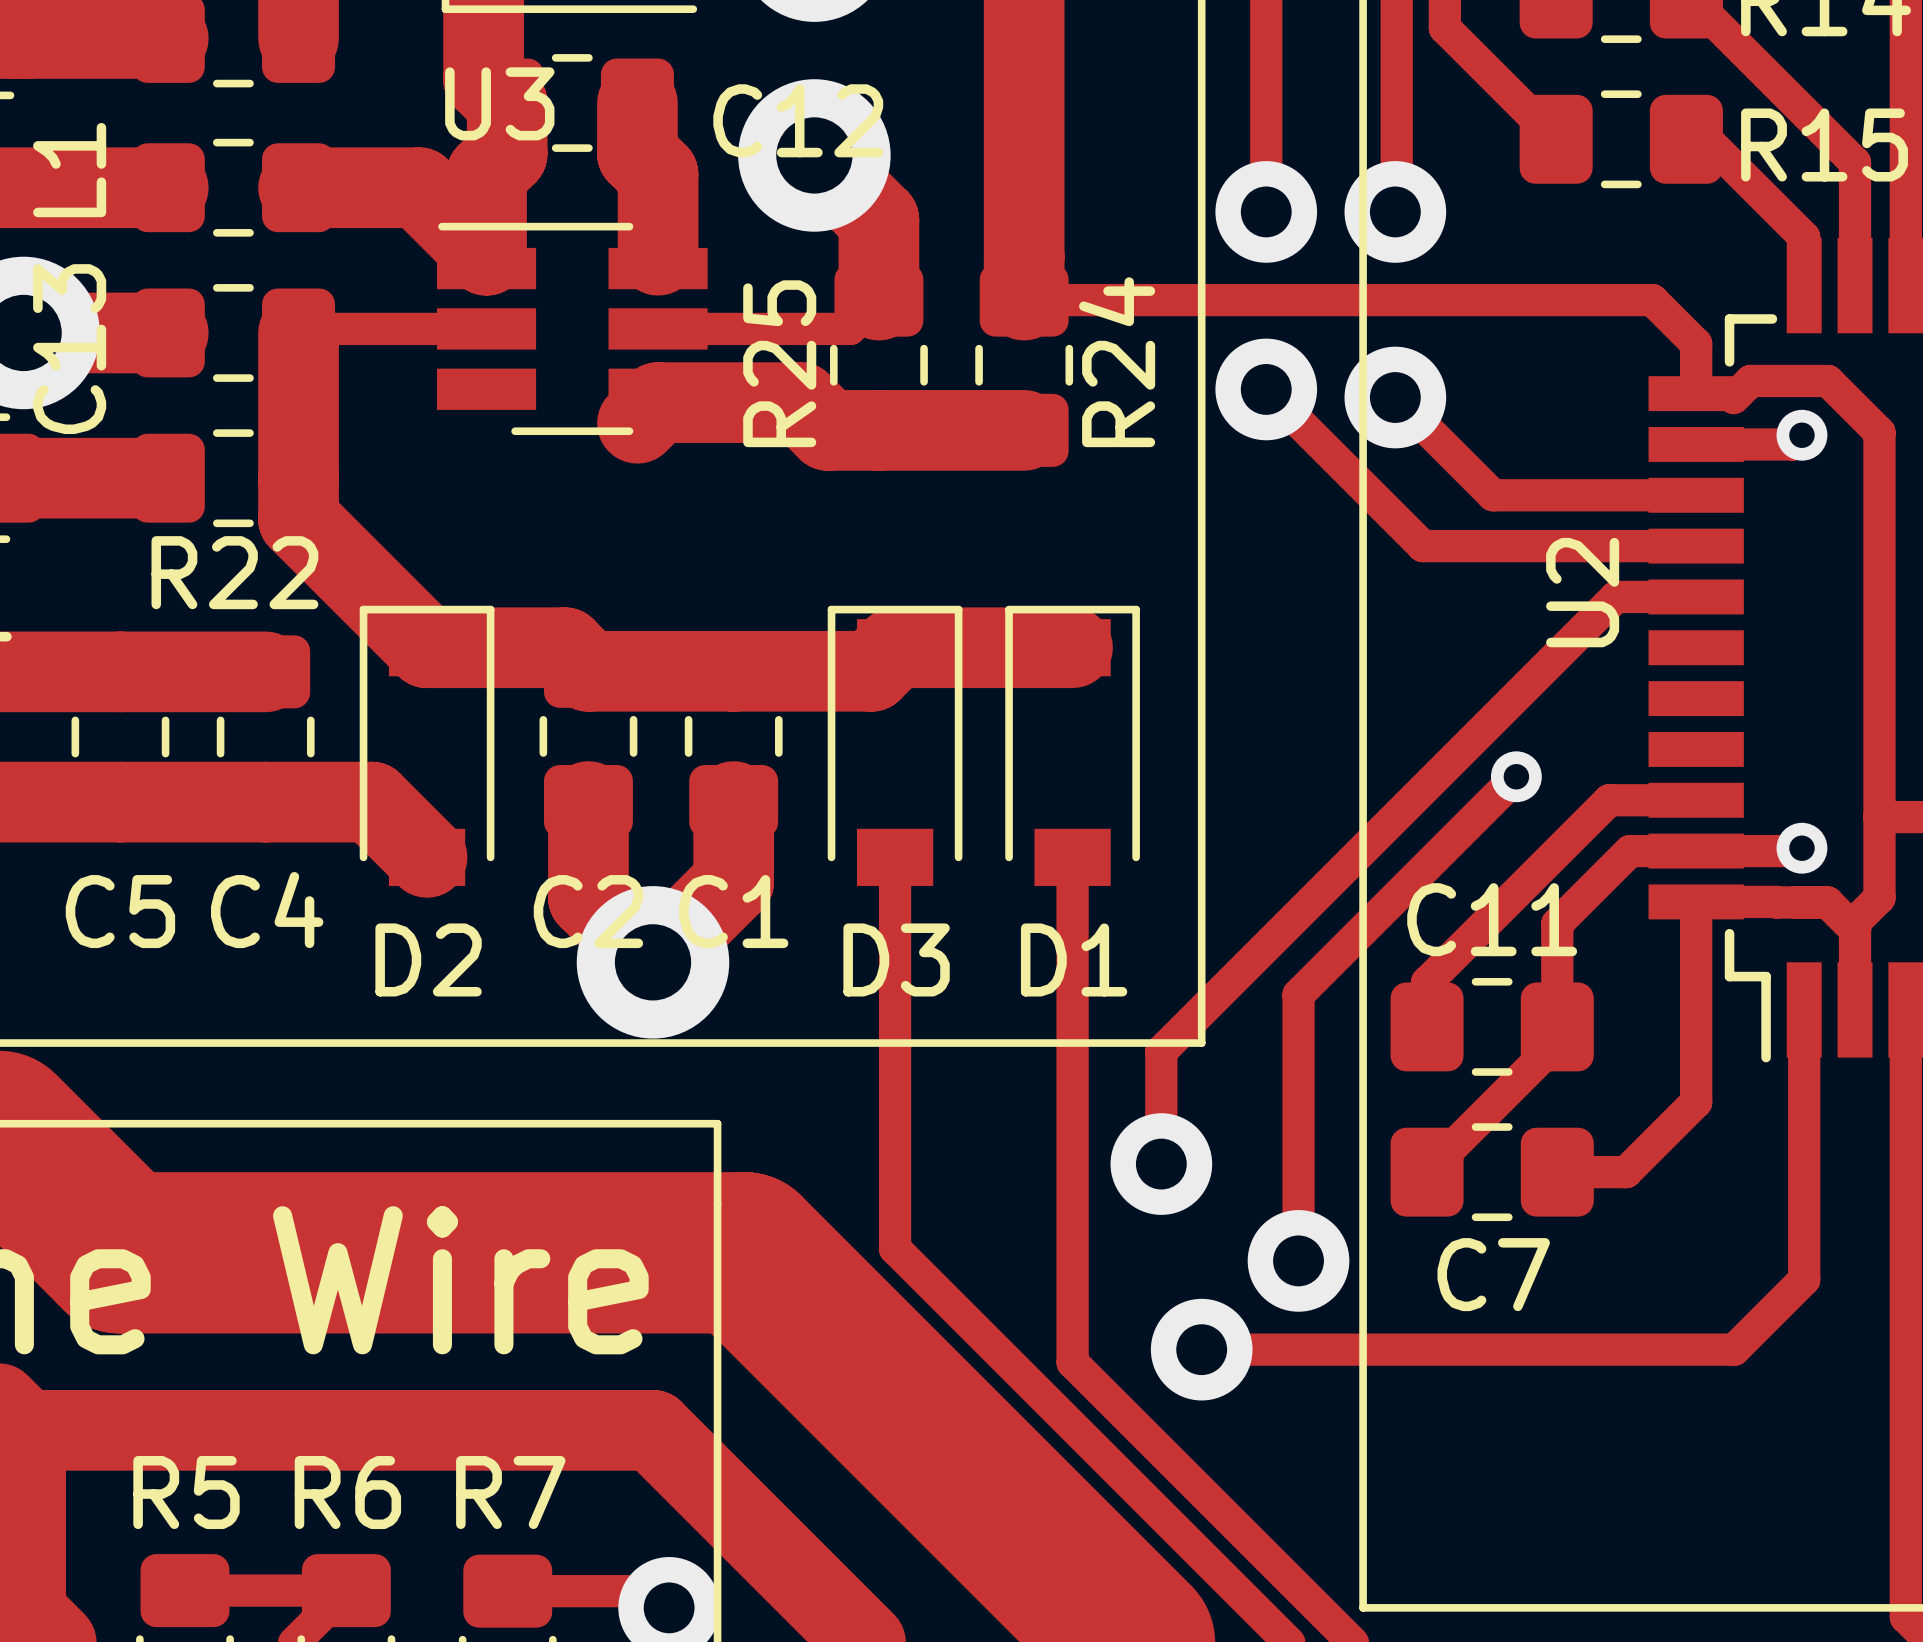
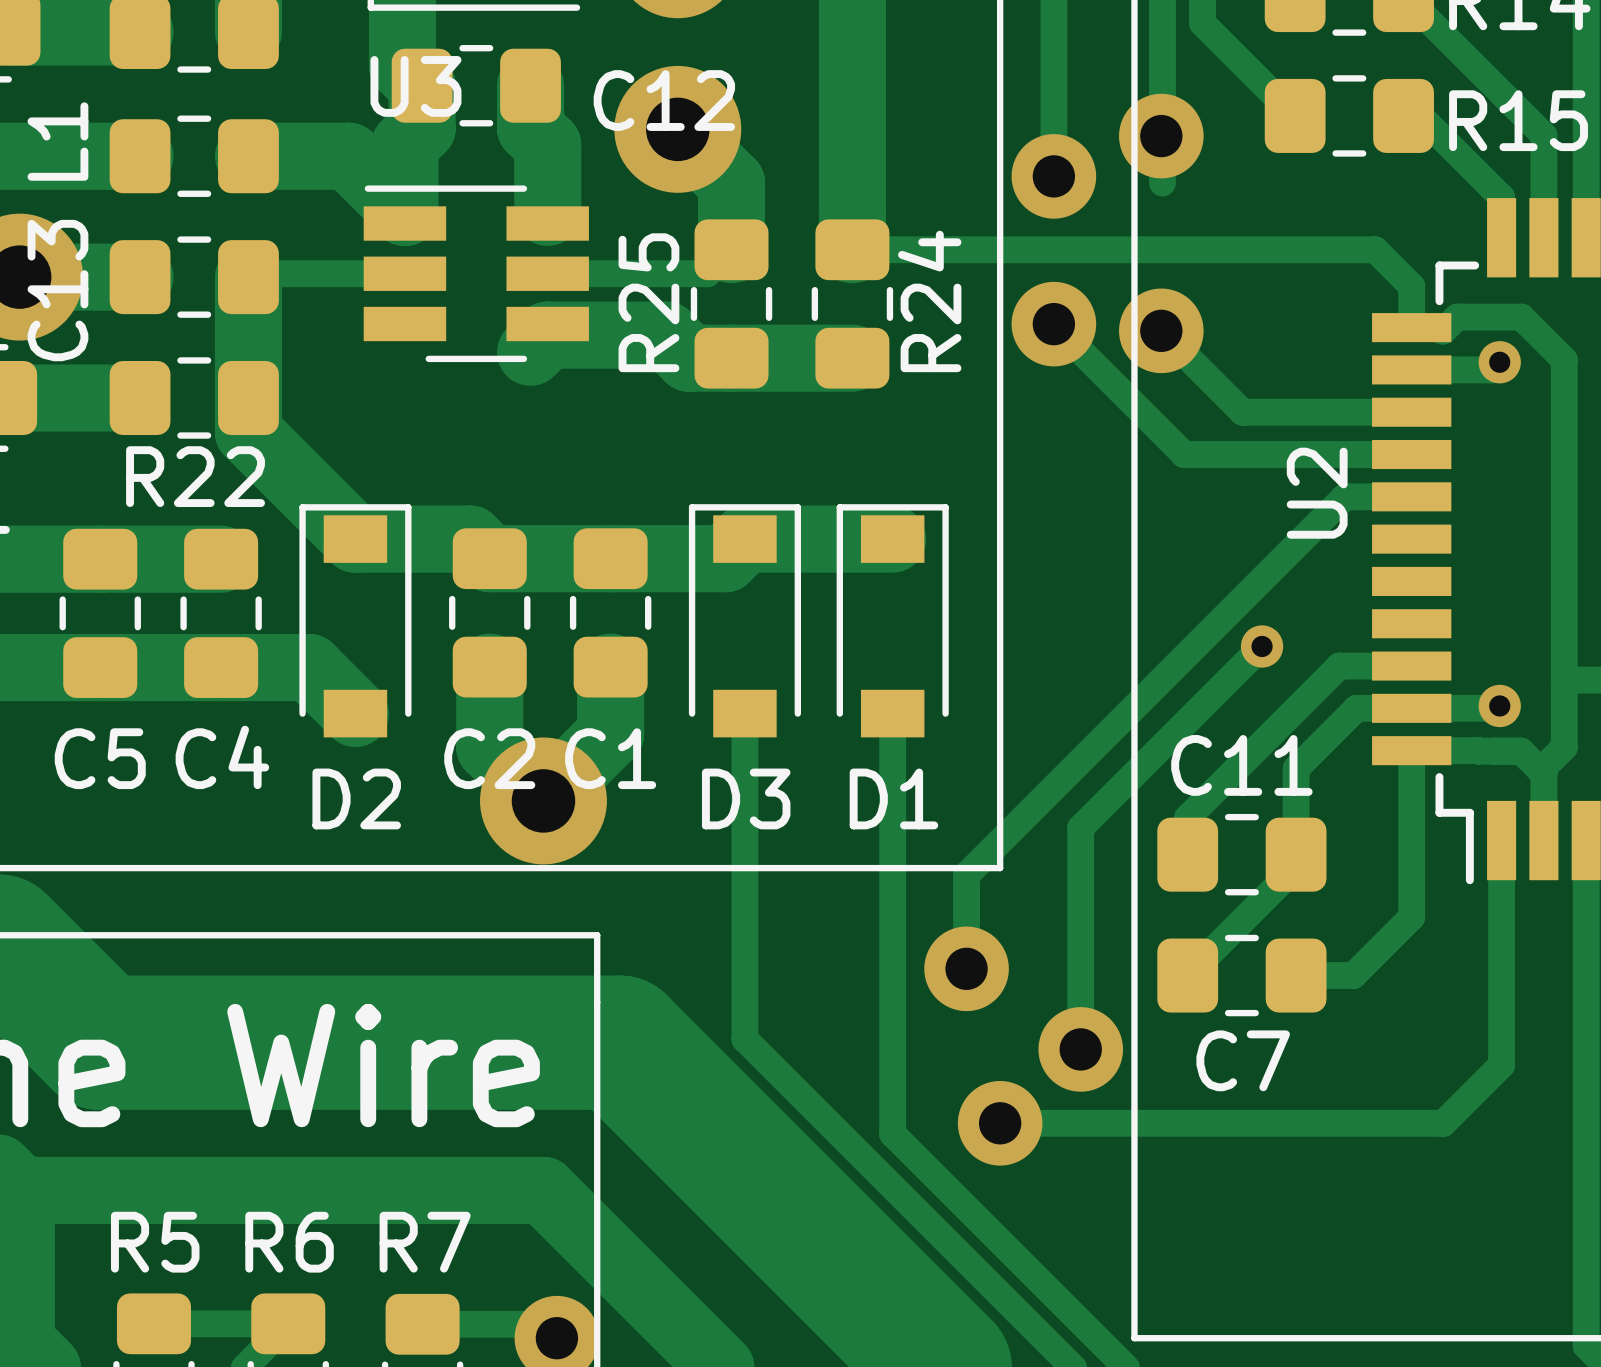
via position: (1395, 211) -> (1161, 136)

